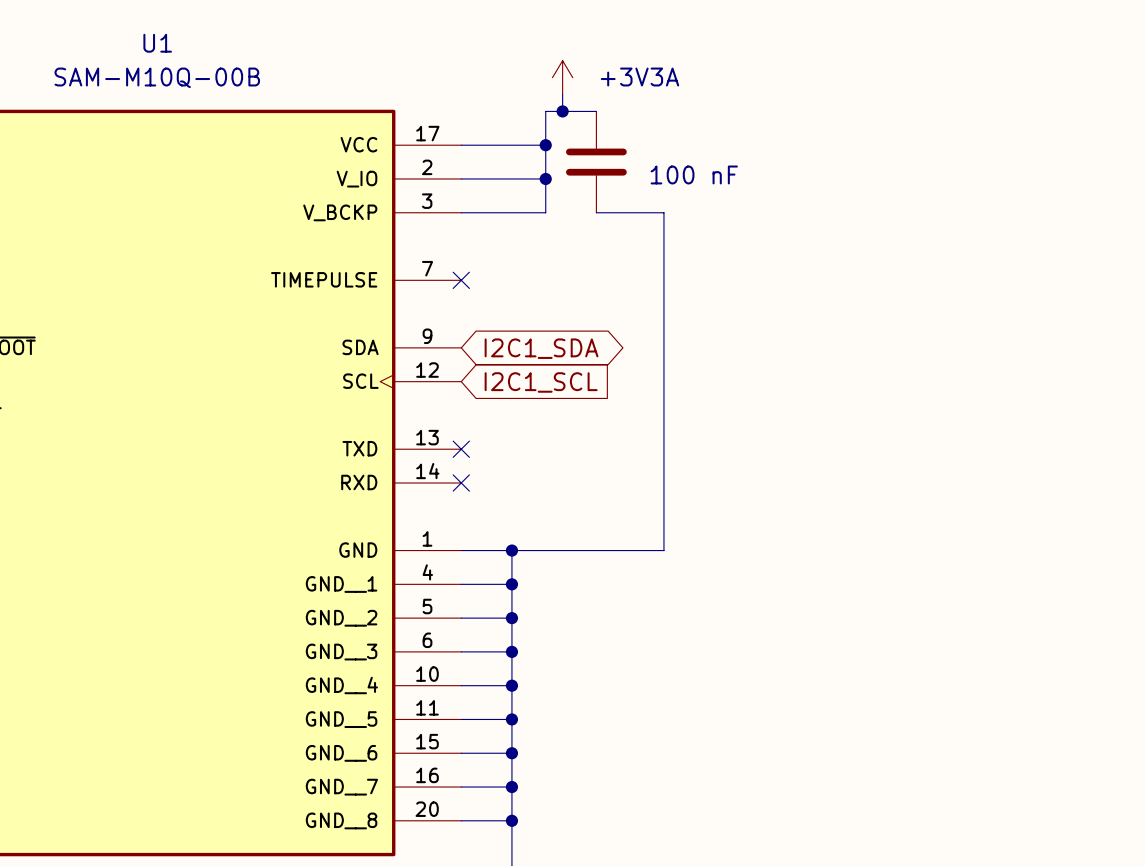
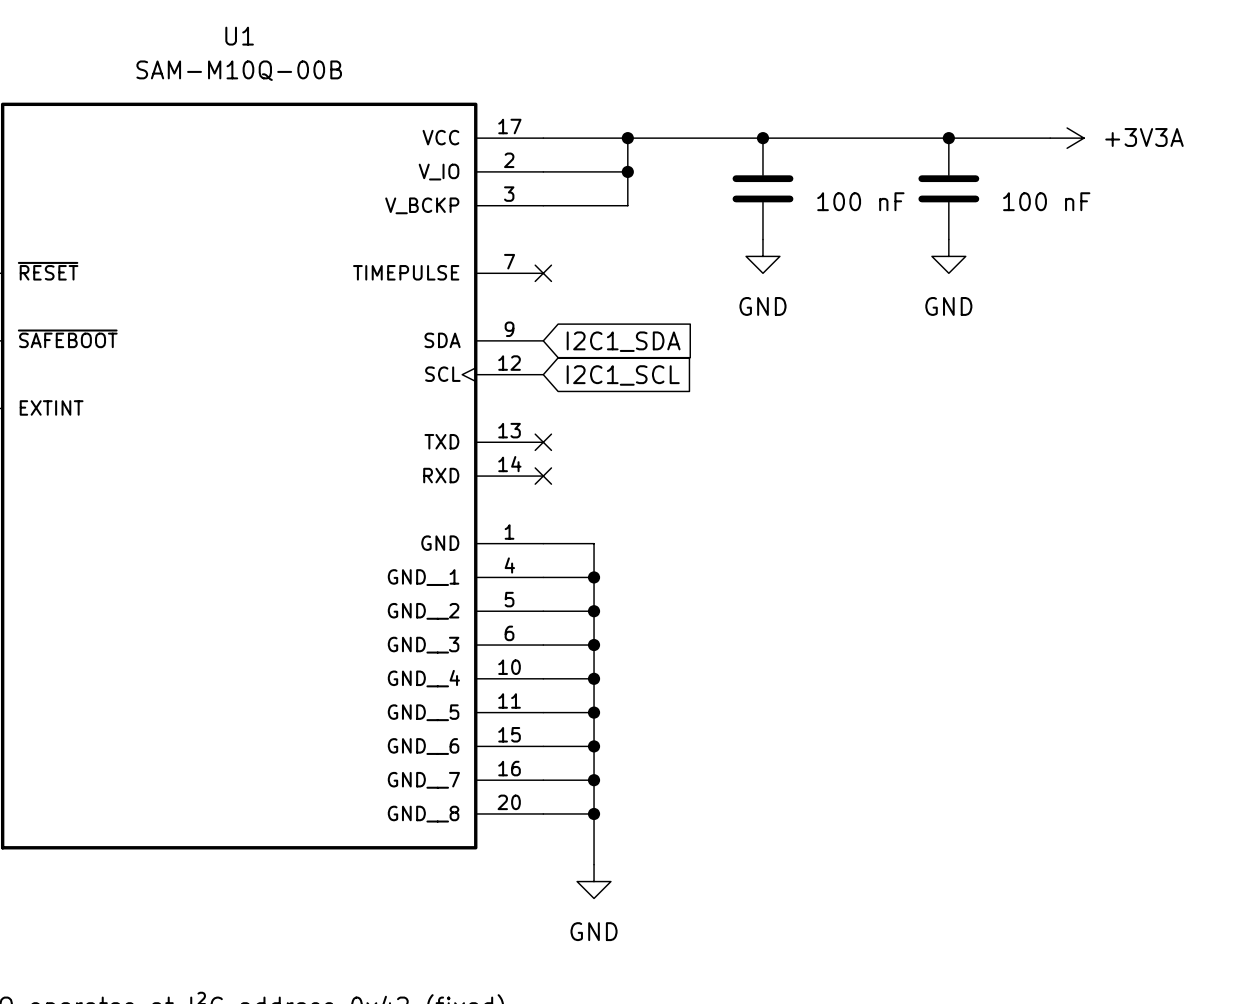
power symbol: +3V3A (562, 77) -> none
wire: (562, 94) (562, 111) -> none
junction: (562, 111) -> none
wire: (596, 111) (545, 111) (545, 145) -> (1050, 138) (627, 138)
junction: none -> (762, 138)
junction: none -> (948, 138)
power symbol: none -> +3V3A (1067, 138)
part position: (596, 162) -> (762, 188)
part: none -> 100 nF (948, 188)
wire: (596, 212) (663, 212) (663, 550) (511, 550) -> none
power symbol: none -> GND (762, 256)
power symbol: none -> GND (948, 256)
global label shape: bidirectional (541, 348) -> input (623, 341)
junction: (511, 550) -> none

